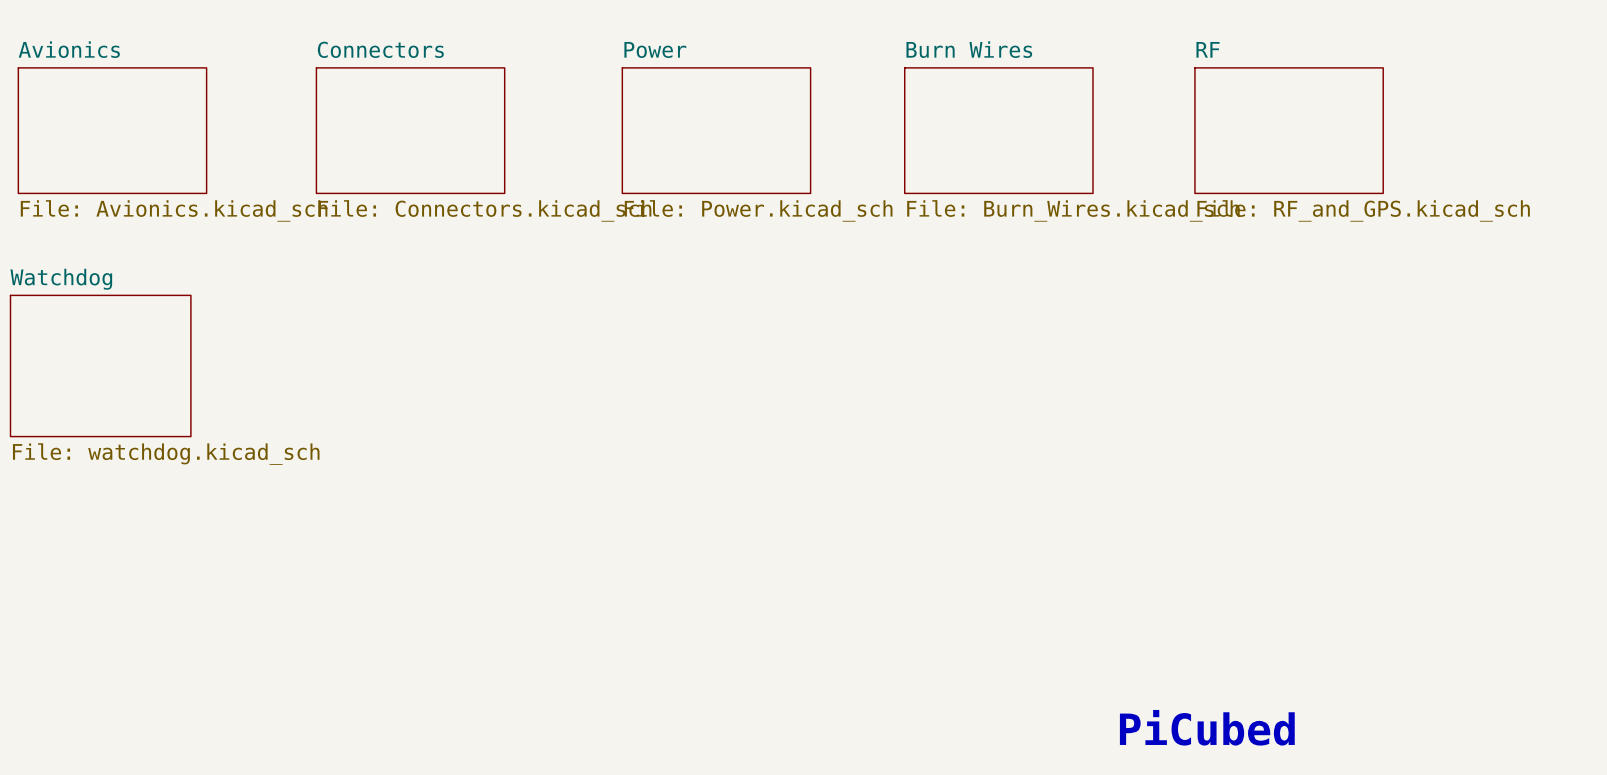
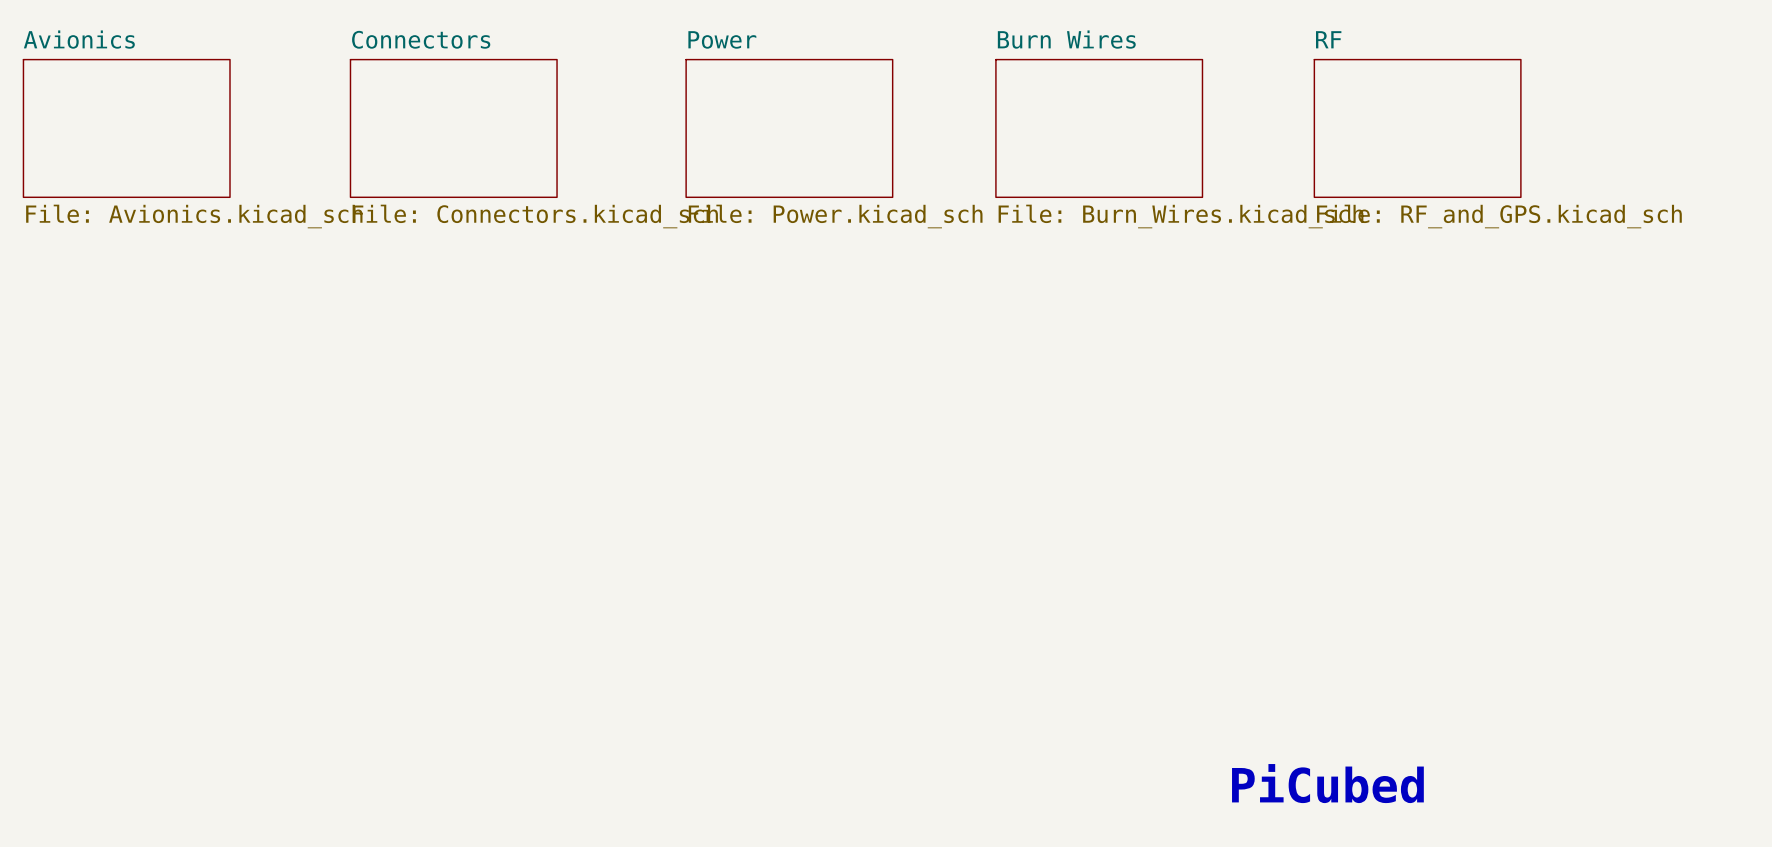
sheet Watchdog: File: watchdog.kicad_sch (100, 365) -> none

